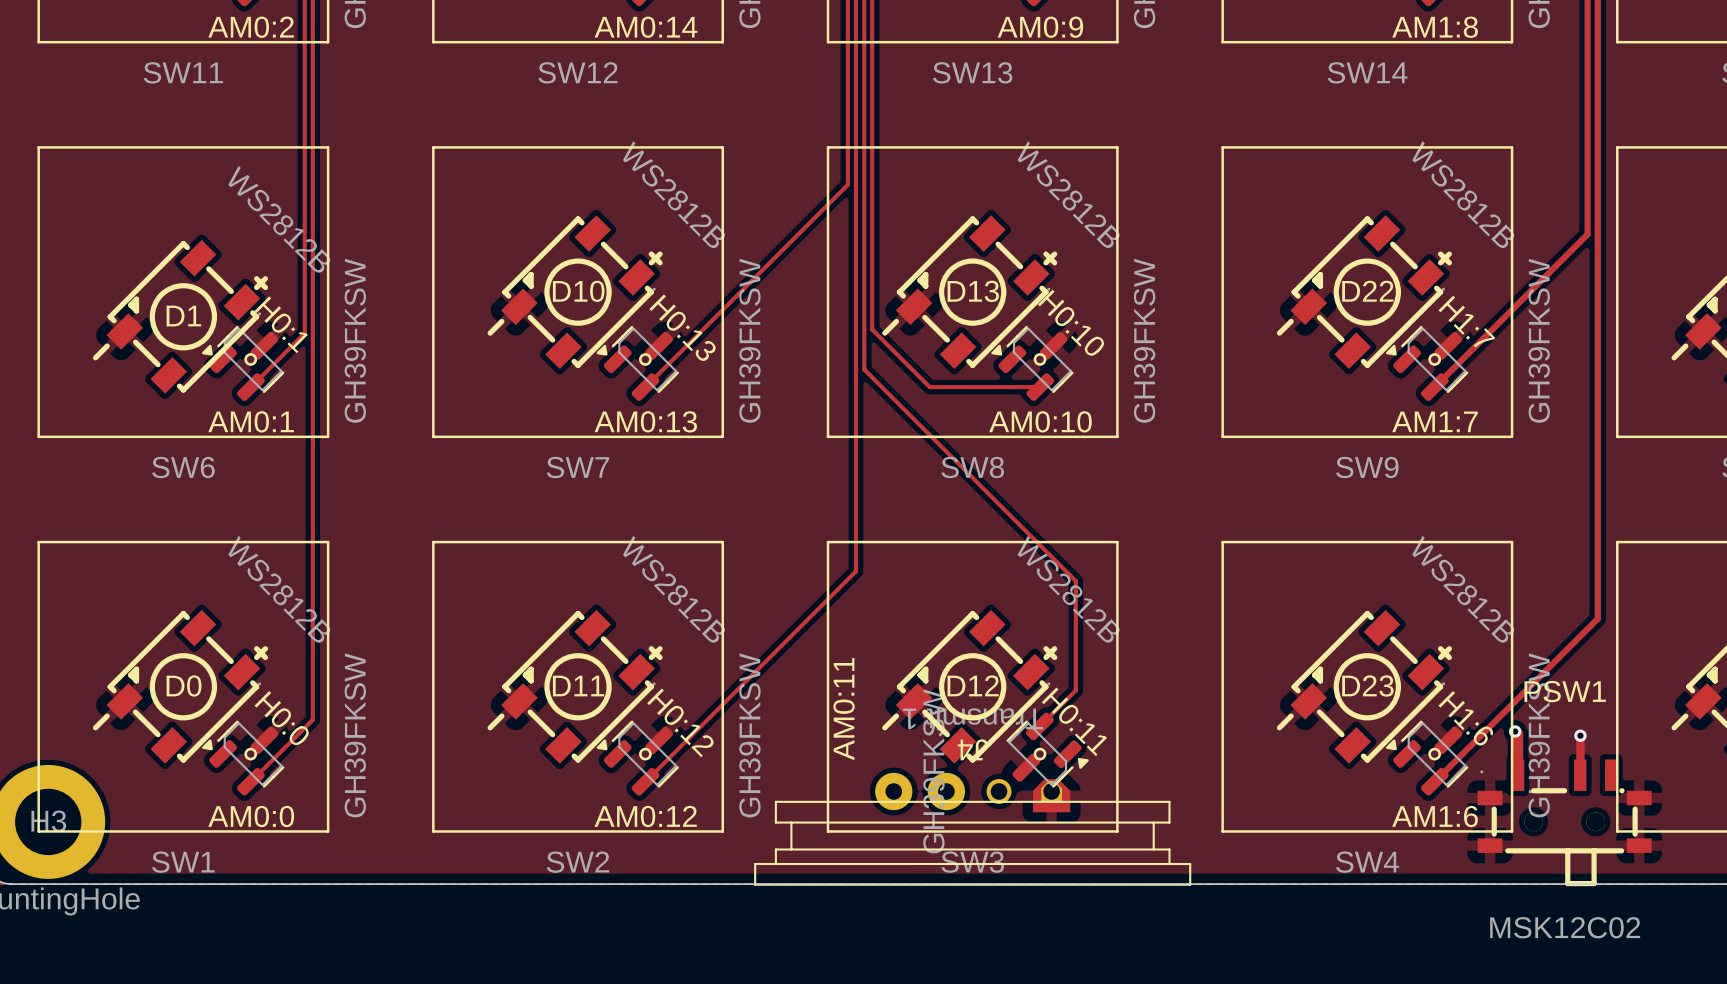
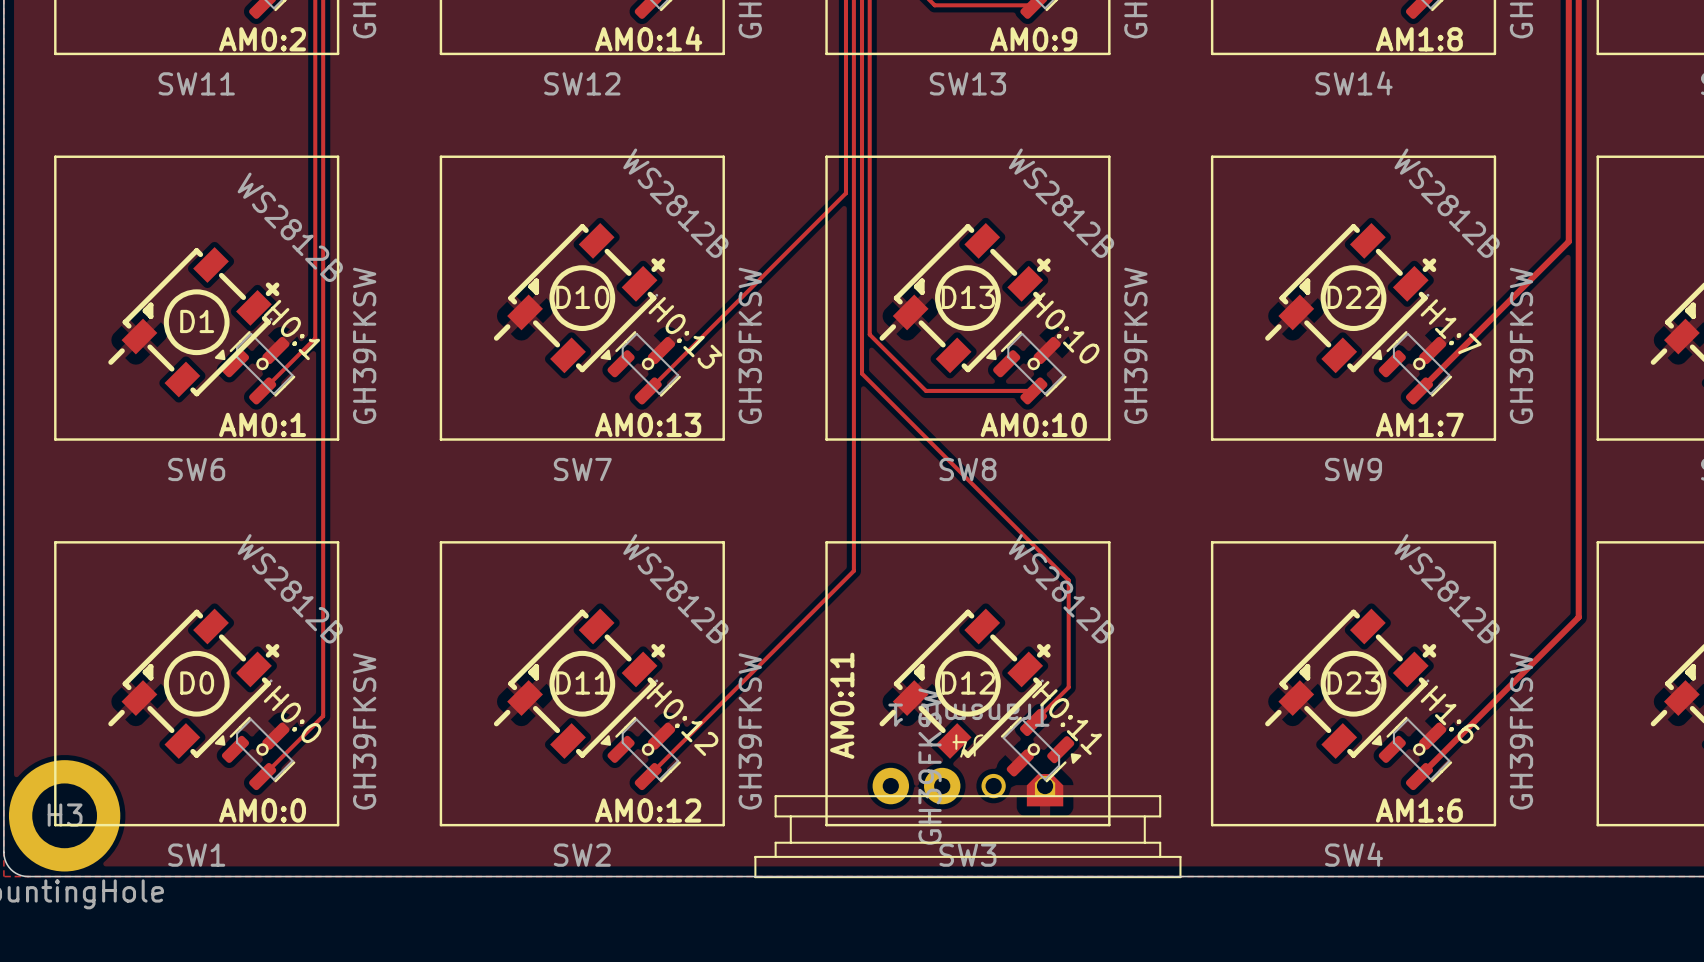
track: (1515, 731) (1518, 734) (1518, 775) -> none
via: (1515, 731) -> none
track: (1580, 735) (1580, 774) -> none
via: (1580, 735) -> none
PSW1: MSK12C02 (1564, 822) -> none

